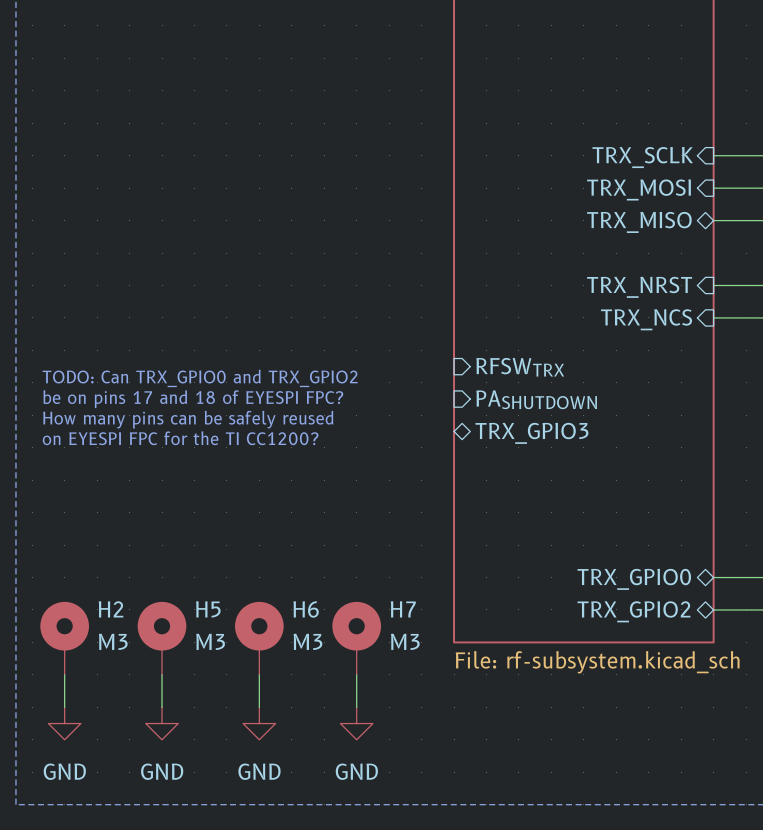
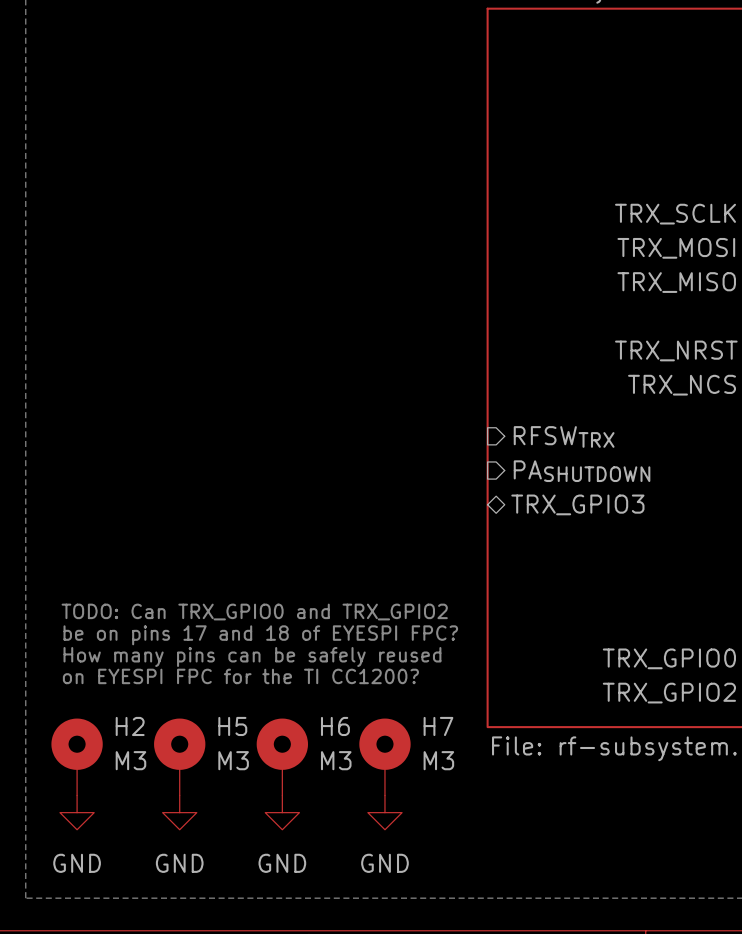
text position: TODO: Can TRX_GPIO0 and TRX_GPIO2 (200, 378) -> TODO: Can TRX_GPIO0 and TRX_GPIO2 (254, 612)
text position: be on pins 17 and 18 of EYESPI FPC? (193, 399) -> be on pins 17 and 18 of EYESPI FPC? (260, 635)
text position: How many pins can be safely reused (188, 419) -> How many pins can be safely reused (252, 657)
text position: on EYESPI FPC for the TI CC1200? (180, 438) -> on EYESPI FPC for the TI CC1200? (240, 676)
H2 position: (64, 638) -> (77, 757)
H5 position: (162, 638) -> (179, 757)
H6 position: (259, 638) -> (282, 757)
H7 position: (356, 638) -> (384, 757)

